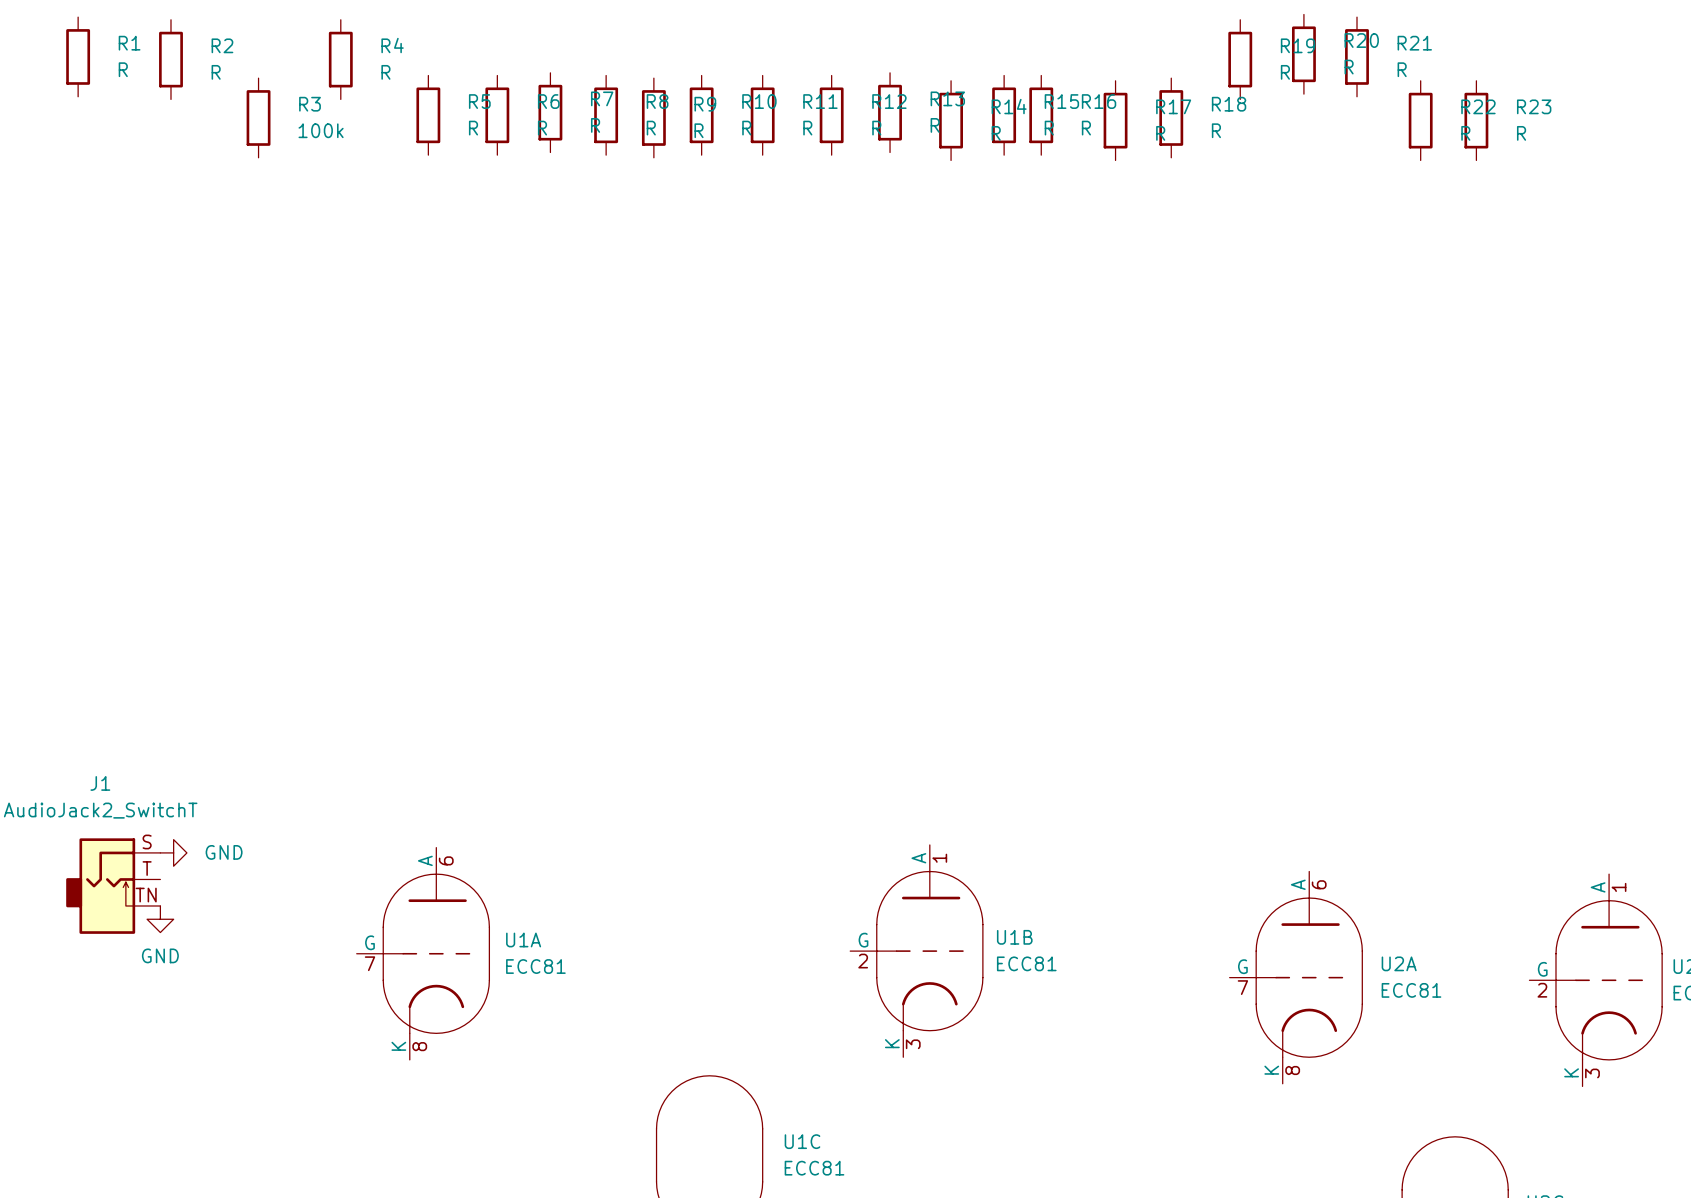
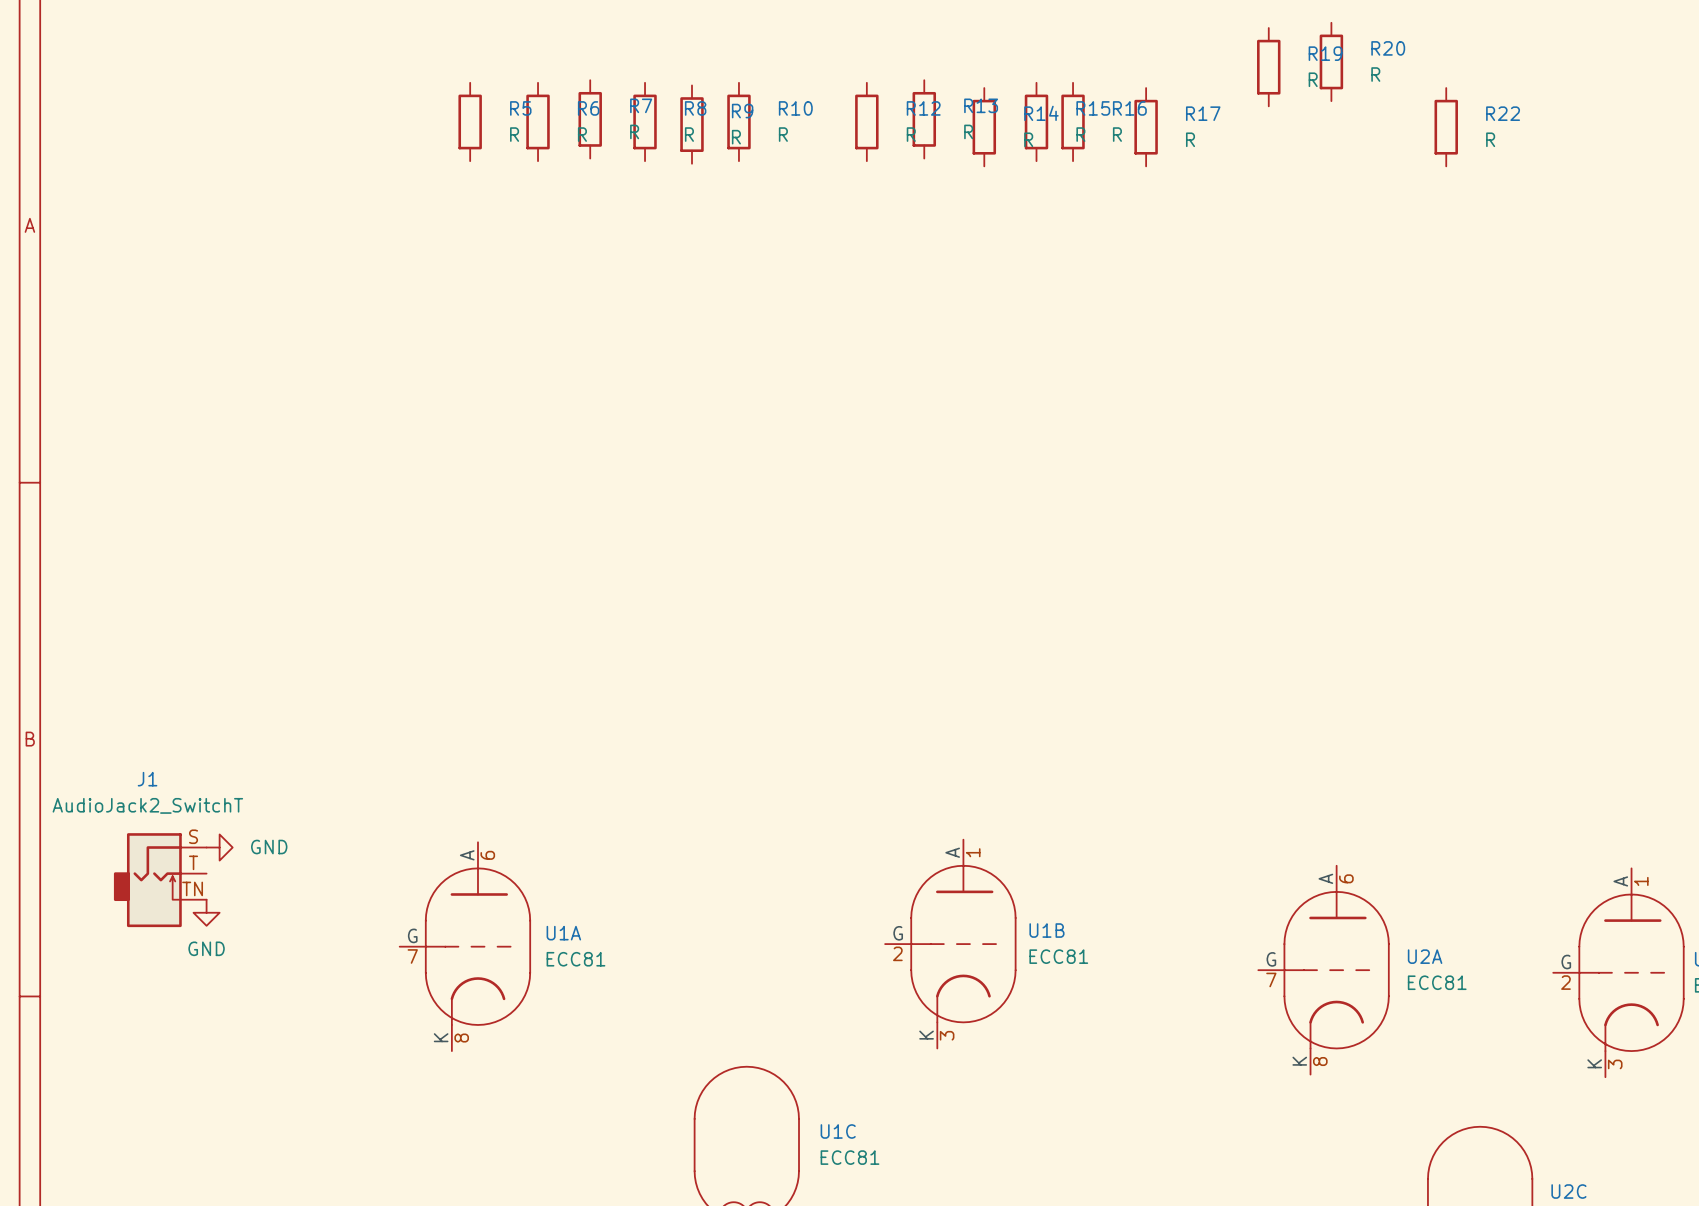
R1: R (78, 56) -> none
R21: R (1357, 56) -> none
R2: R (170, 59) -> none
R4: R (340, 59) -> none
R11: R (762, 115) -> none
R3: 100k (258, 117) -> none
R18: R (1171, 117) -> none
R23: R (1476, 120) -> none

